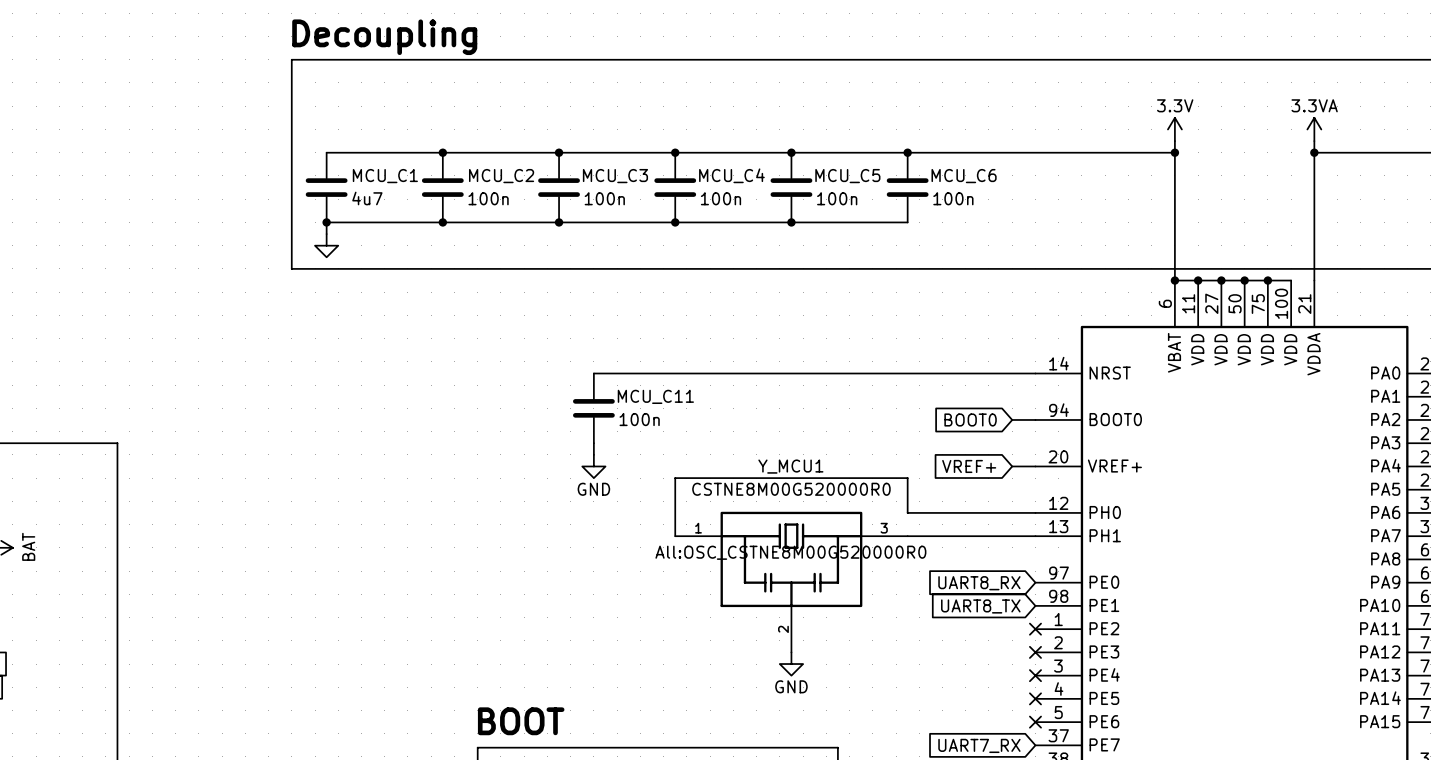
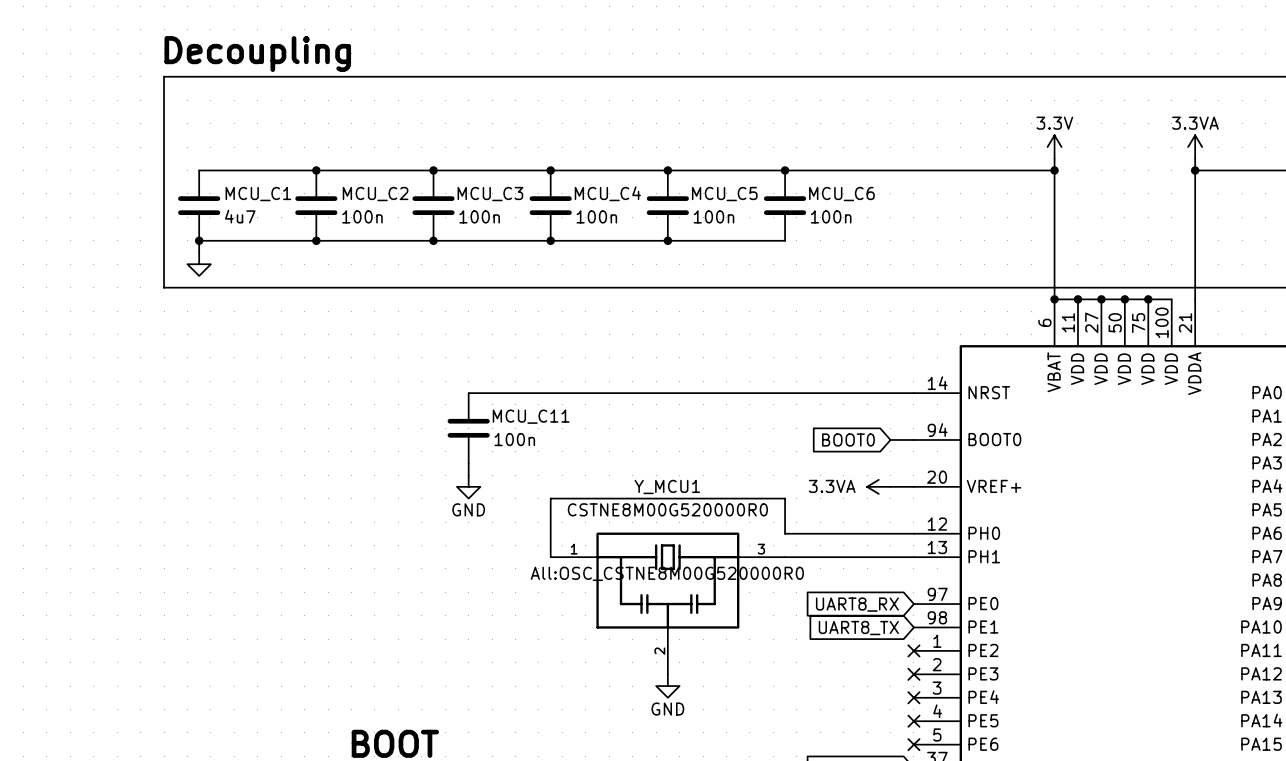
global label: VREF+ (969, 466) -> none
power symbol: none -> 3.3VA (878, 486)

